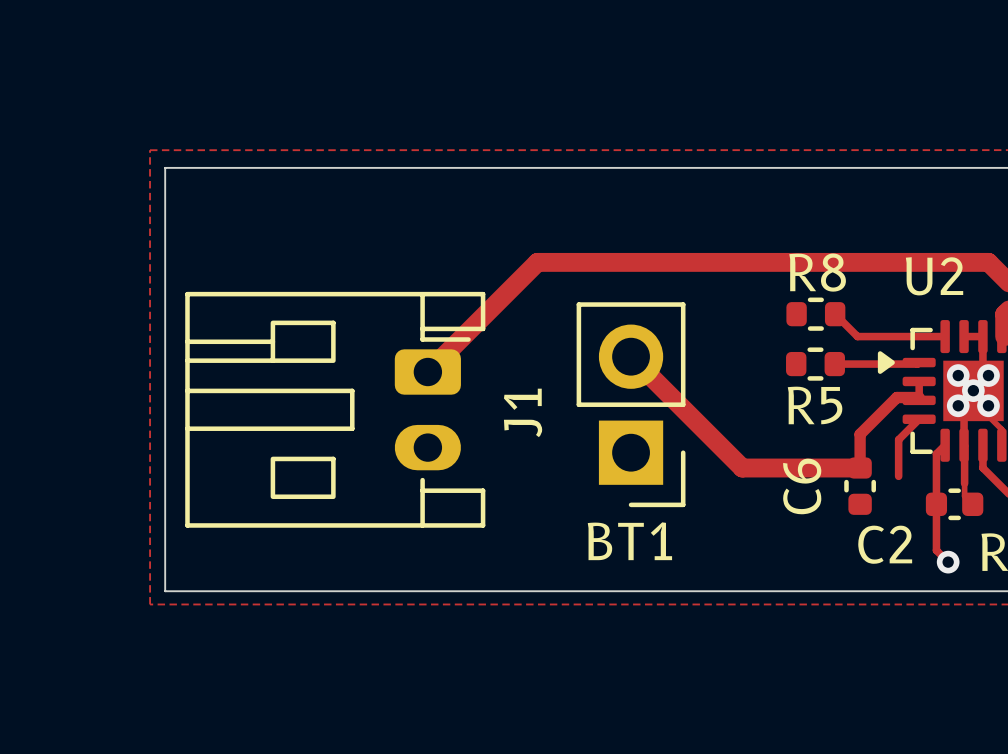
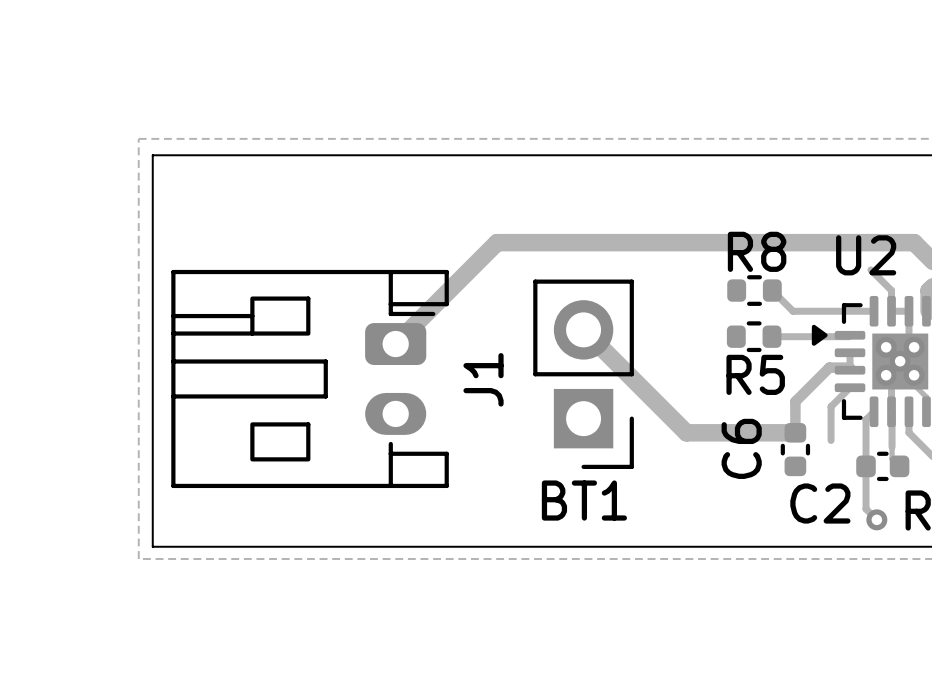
track: none -> (870, 269) (891, 290) (891, 311)

